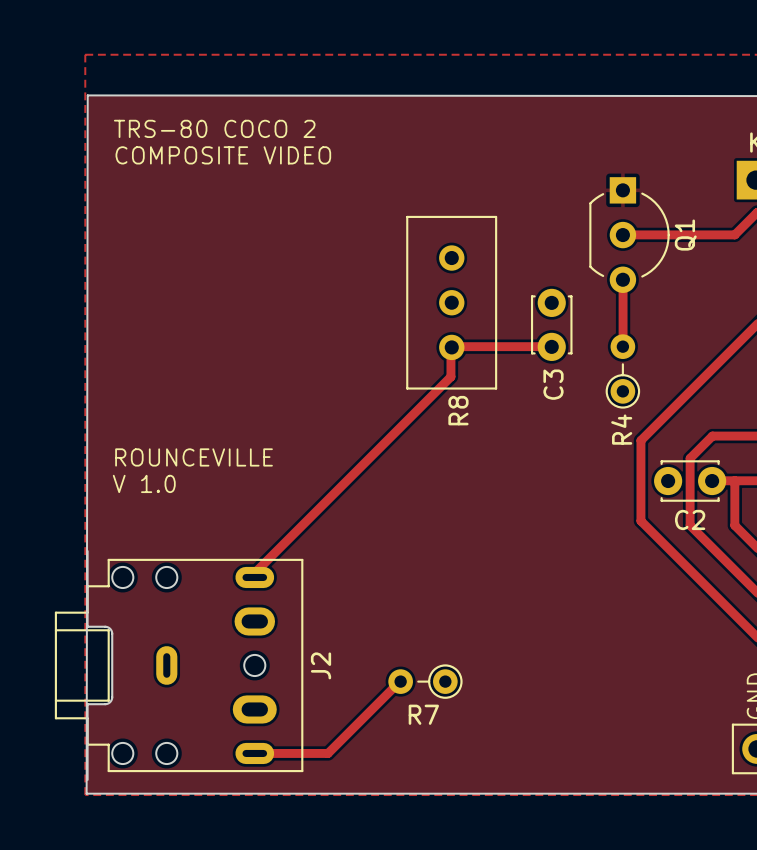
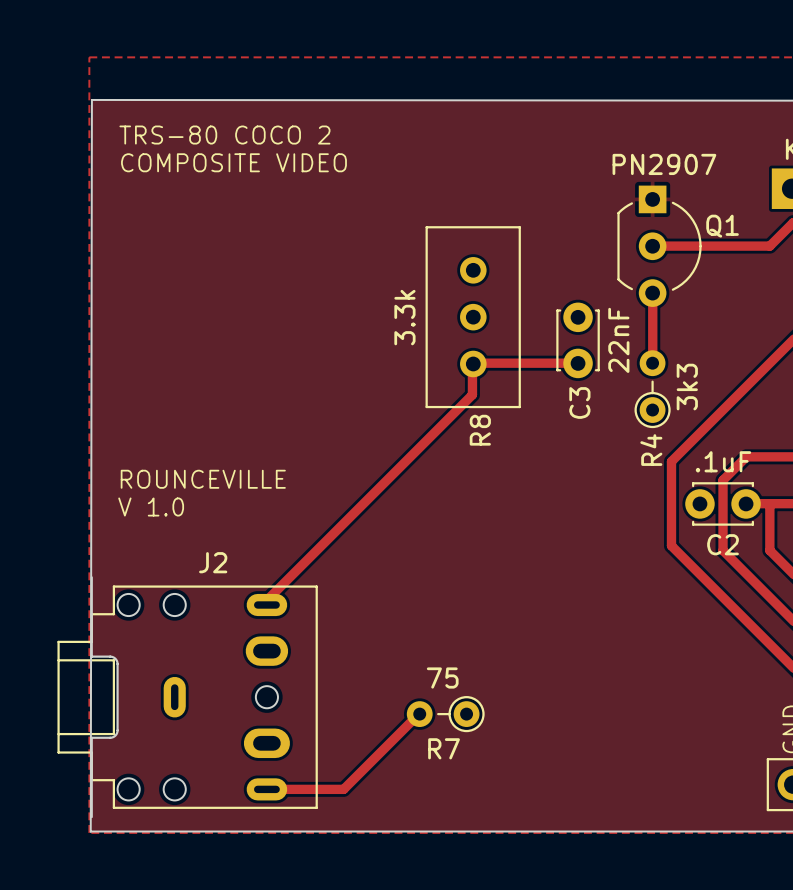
Q1 value: none -> PN2907 (664, 164)
Q1 name rotation: 0° (685, 235) -> 90° clockwise (722, 226)
R8 value: none -> 3.3k (404, 317)
C3 value: none -> 22nF (618, 340)
R4 value: none -> 3k3 (687, 387)
C2 value: none -> .1uF (723, 461)
R7 value: none -> 75 (442, 678)
J2 name rotation: 0° (321, 665) -> 90° clockwise (213, 562)
J2 name position: J2 (321, 665) -> J2 (213, 562)

